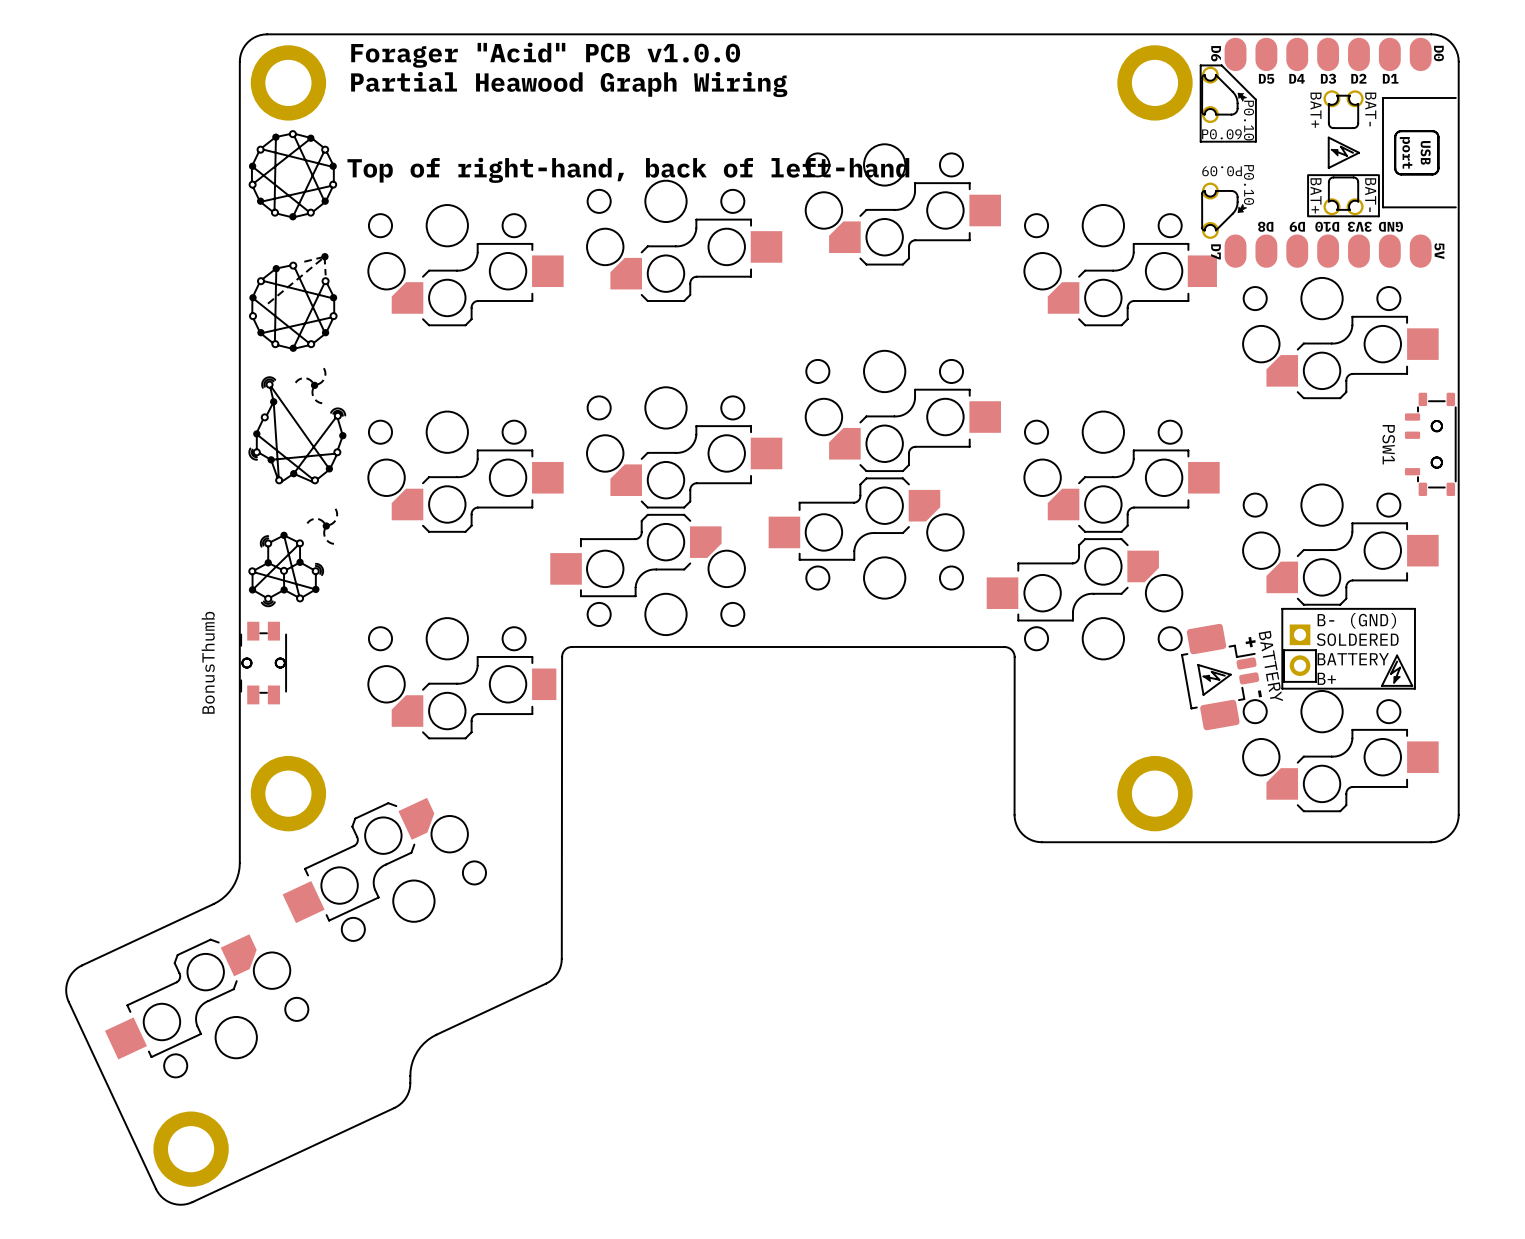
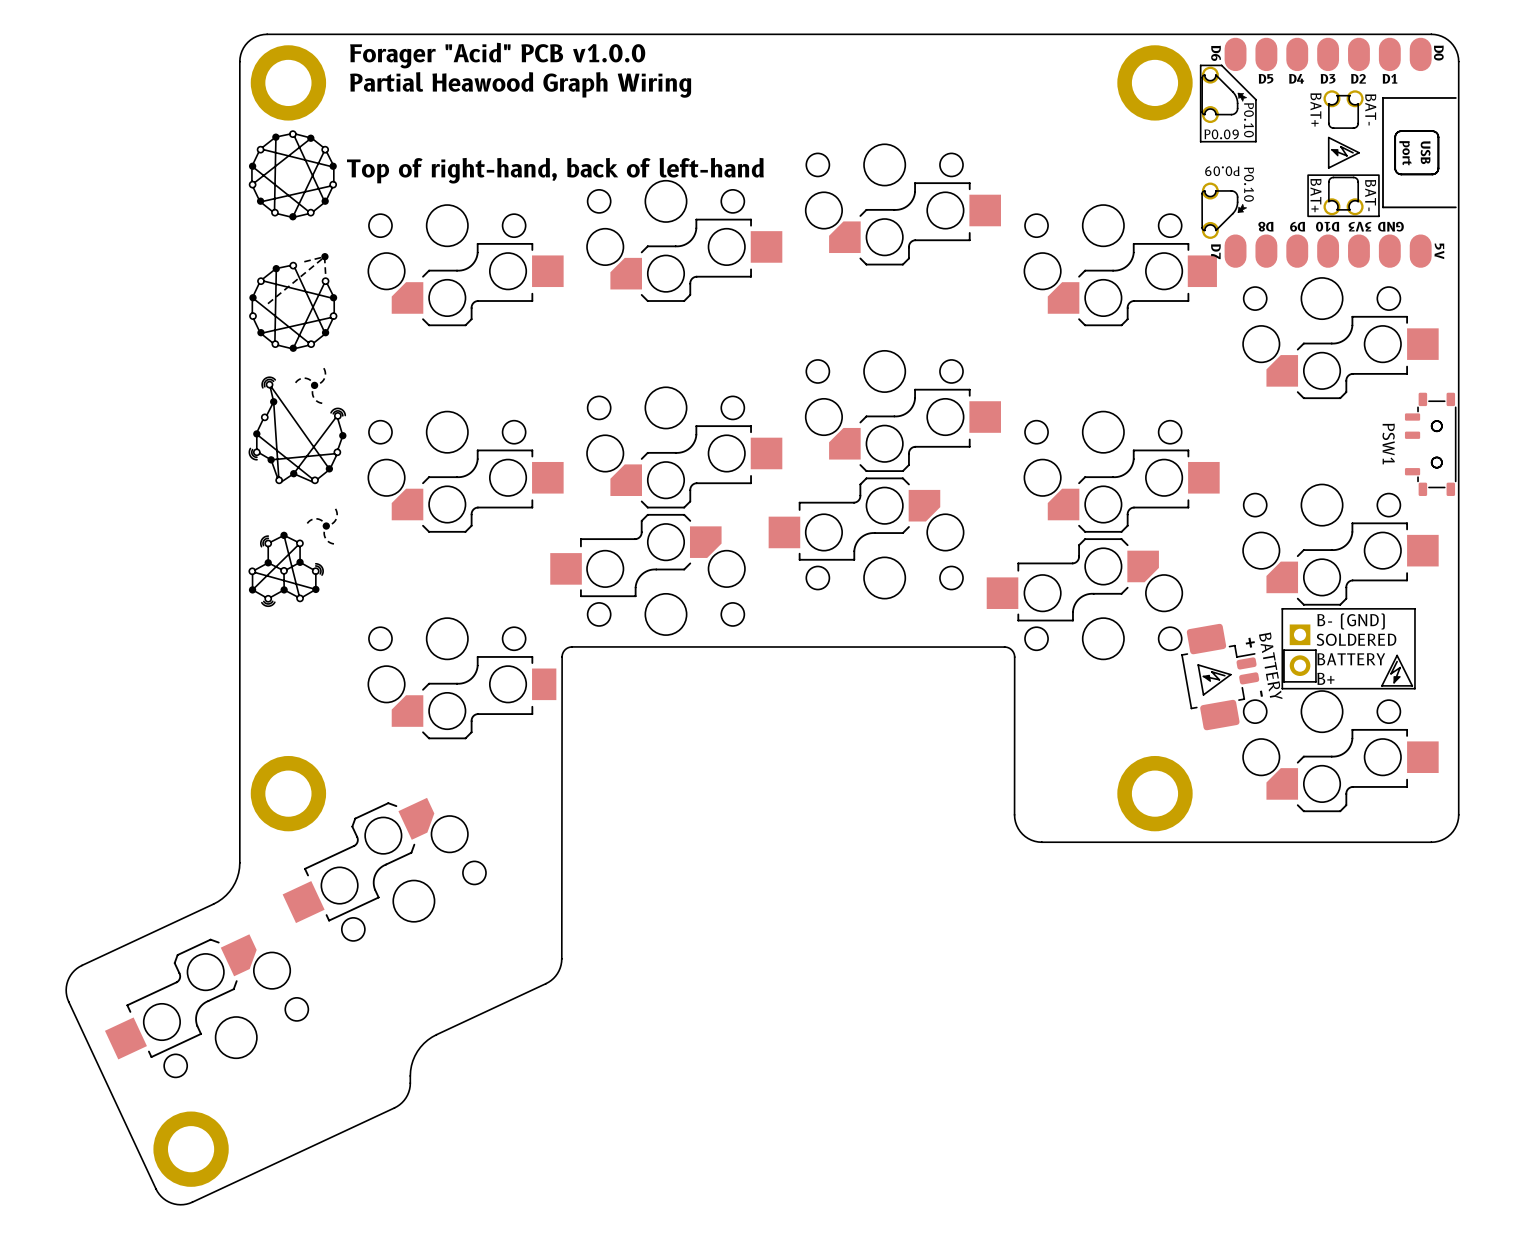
BonusThumb: (263, 663) -> none
part: (263, 663) -> none

